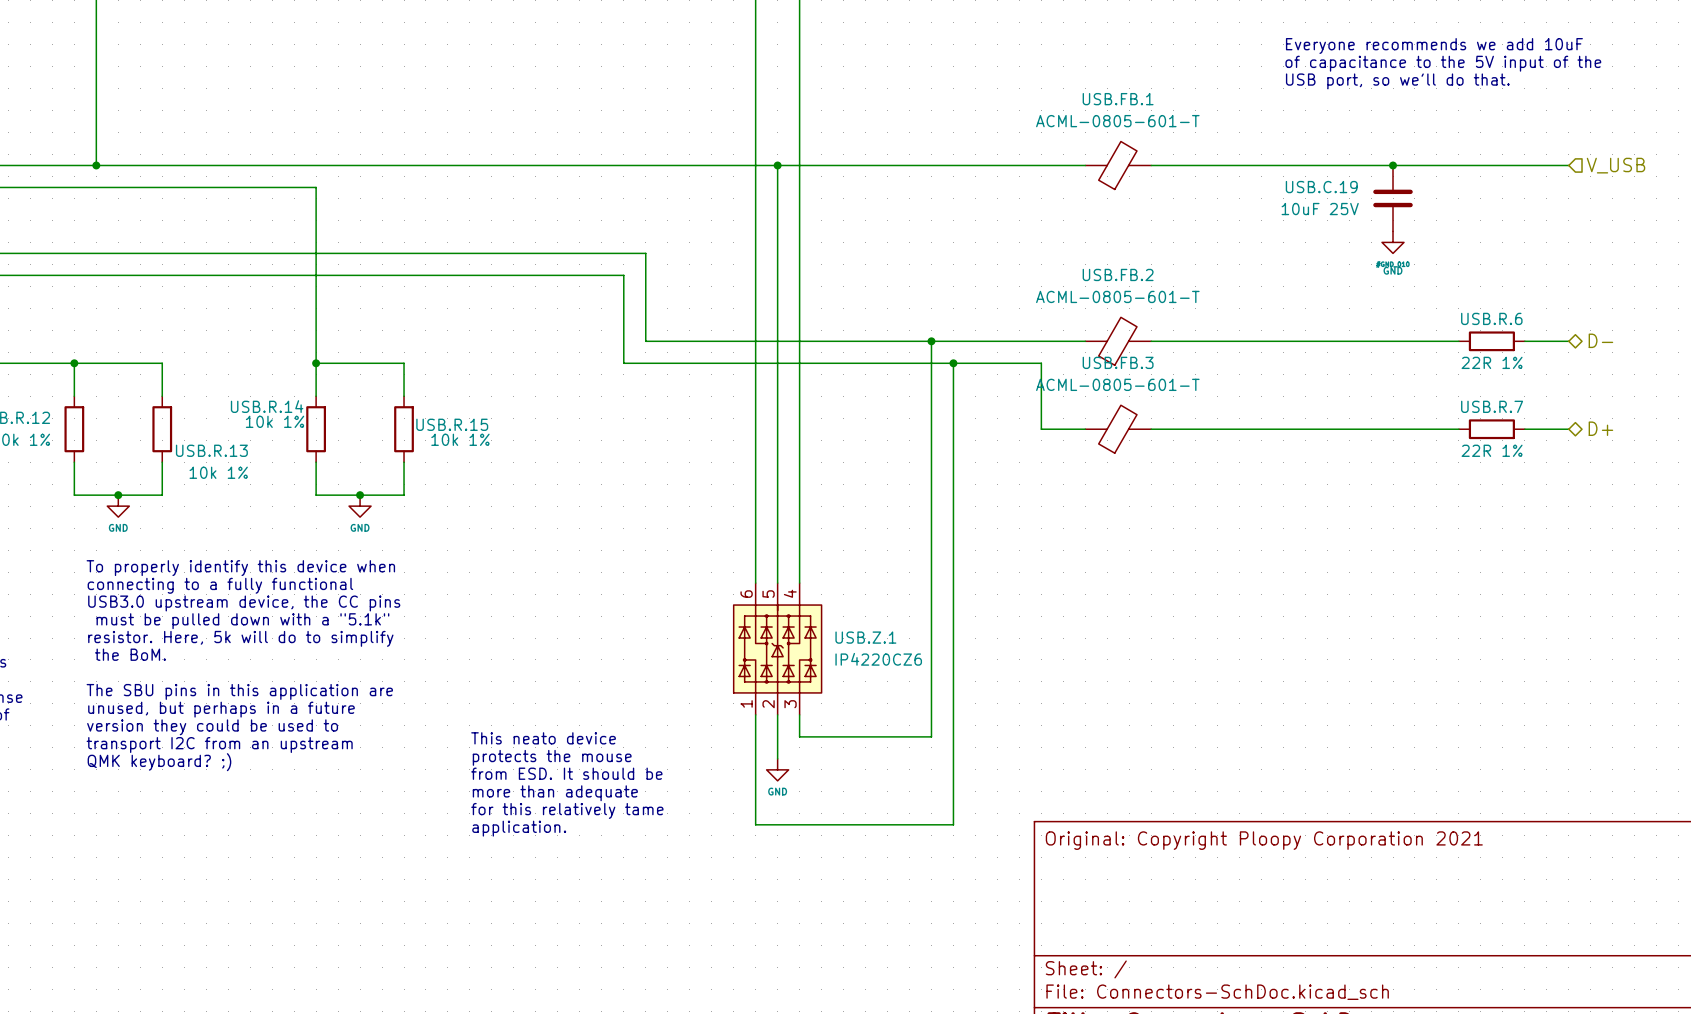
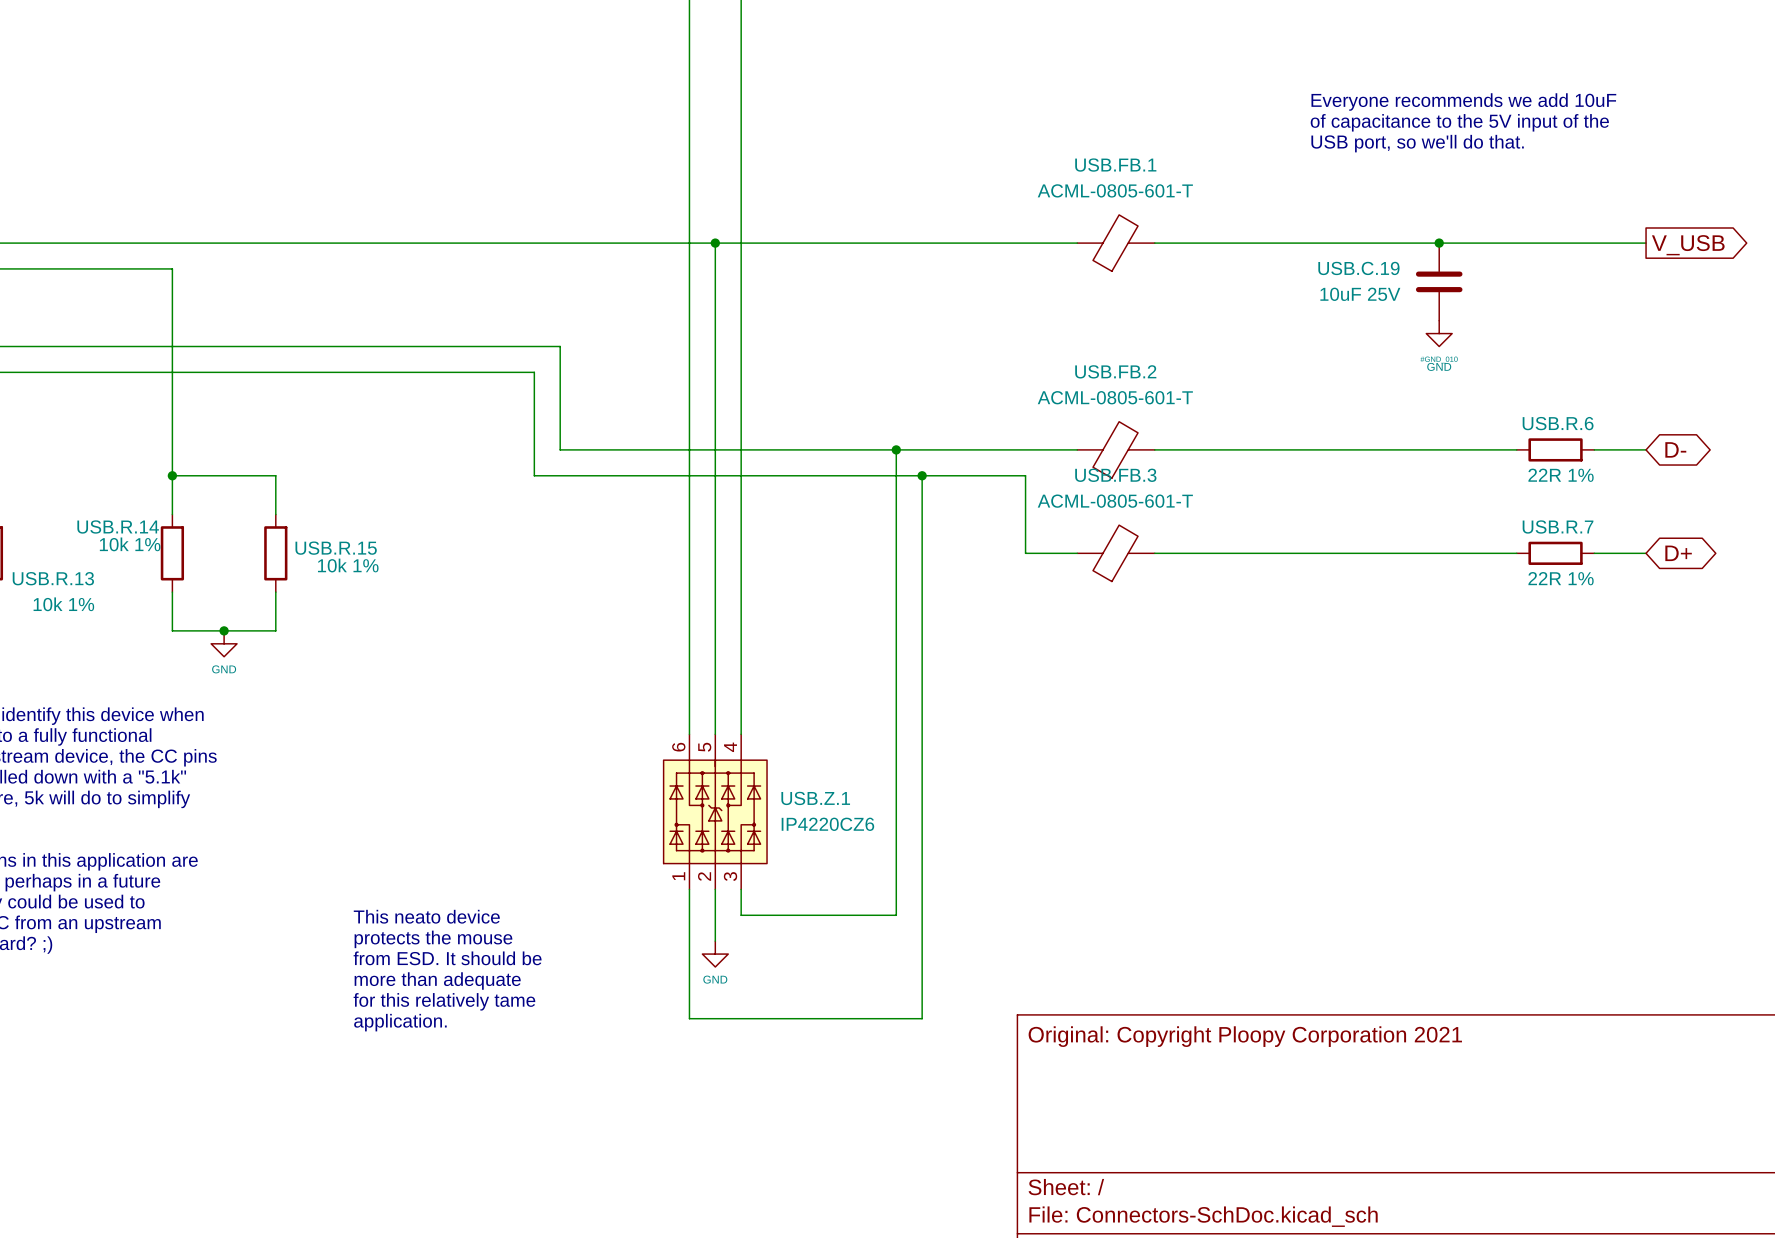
hierarchical label: V_USB (1616, 165) -> none
global label: none -> V_USB (1688, 245)
hierarchical label: D- (1600, 340) -> none
global label: none -> D- (1675, 449)
hierarchical label: D+ (1600, 428) -> none
global label: none -> D+ (1678, 553)

